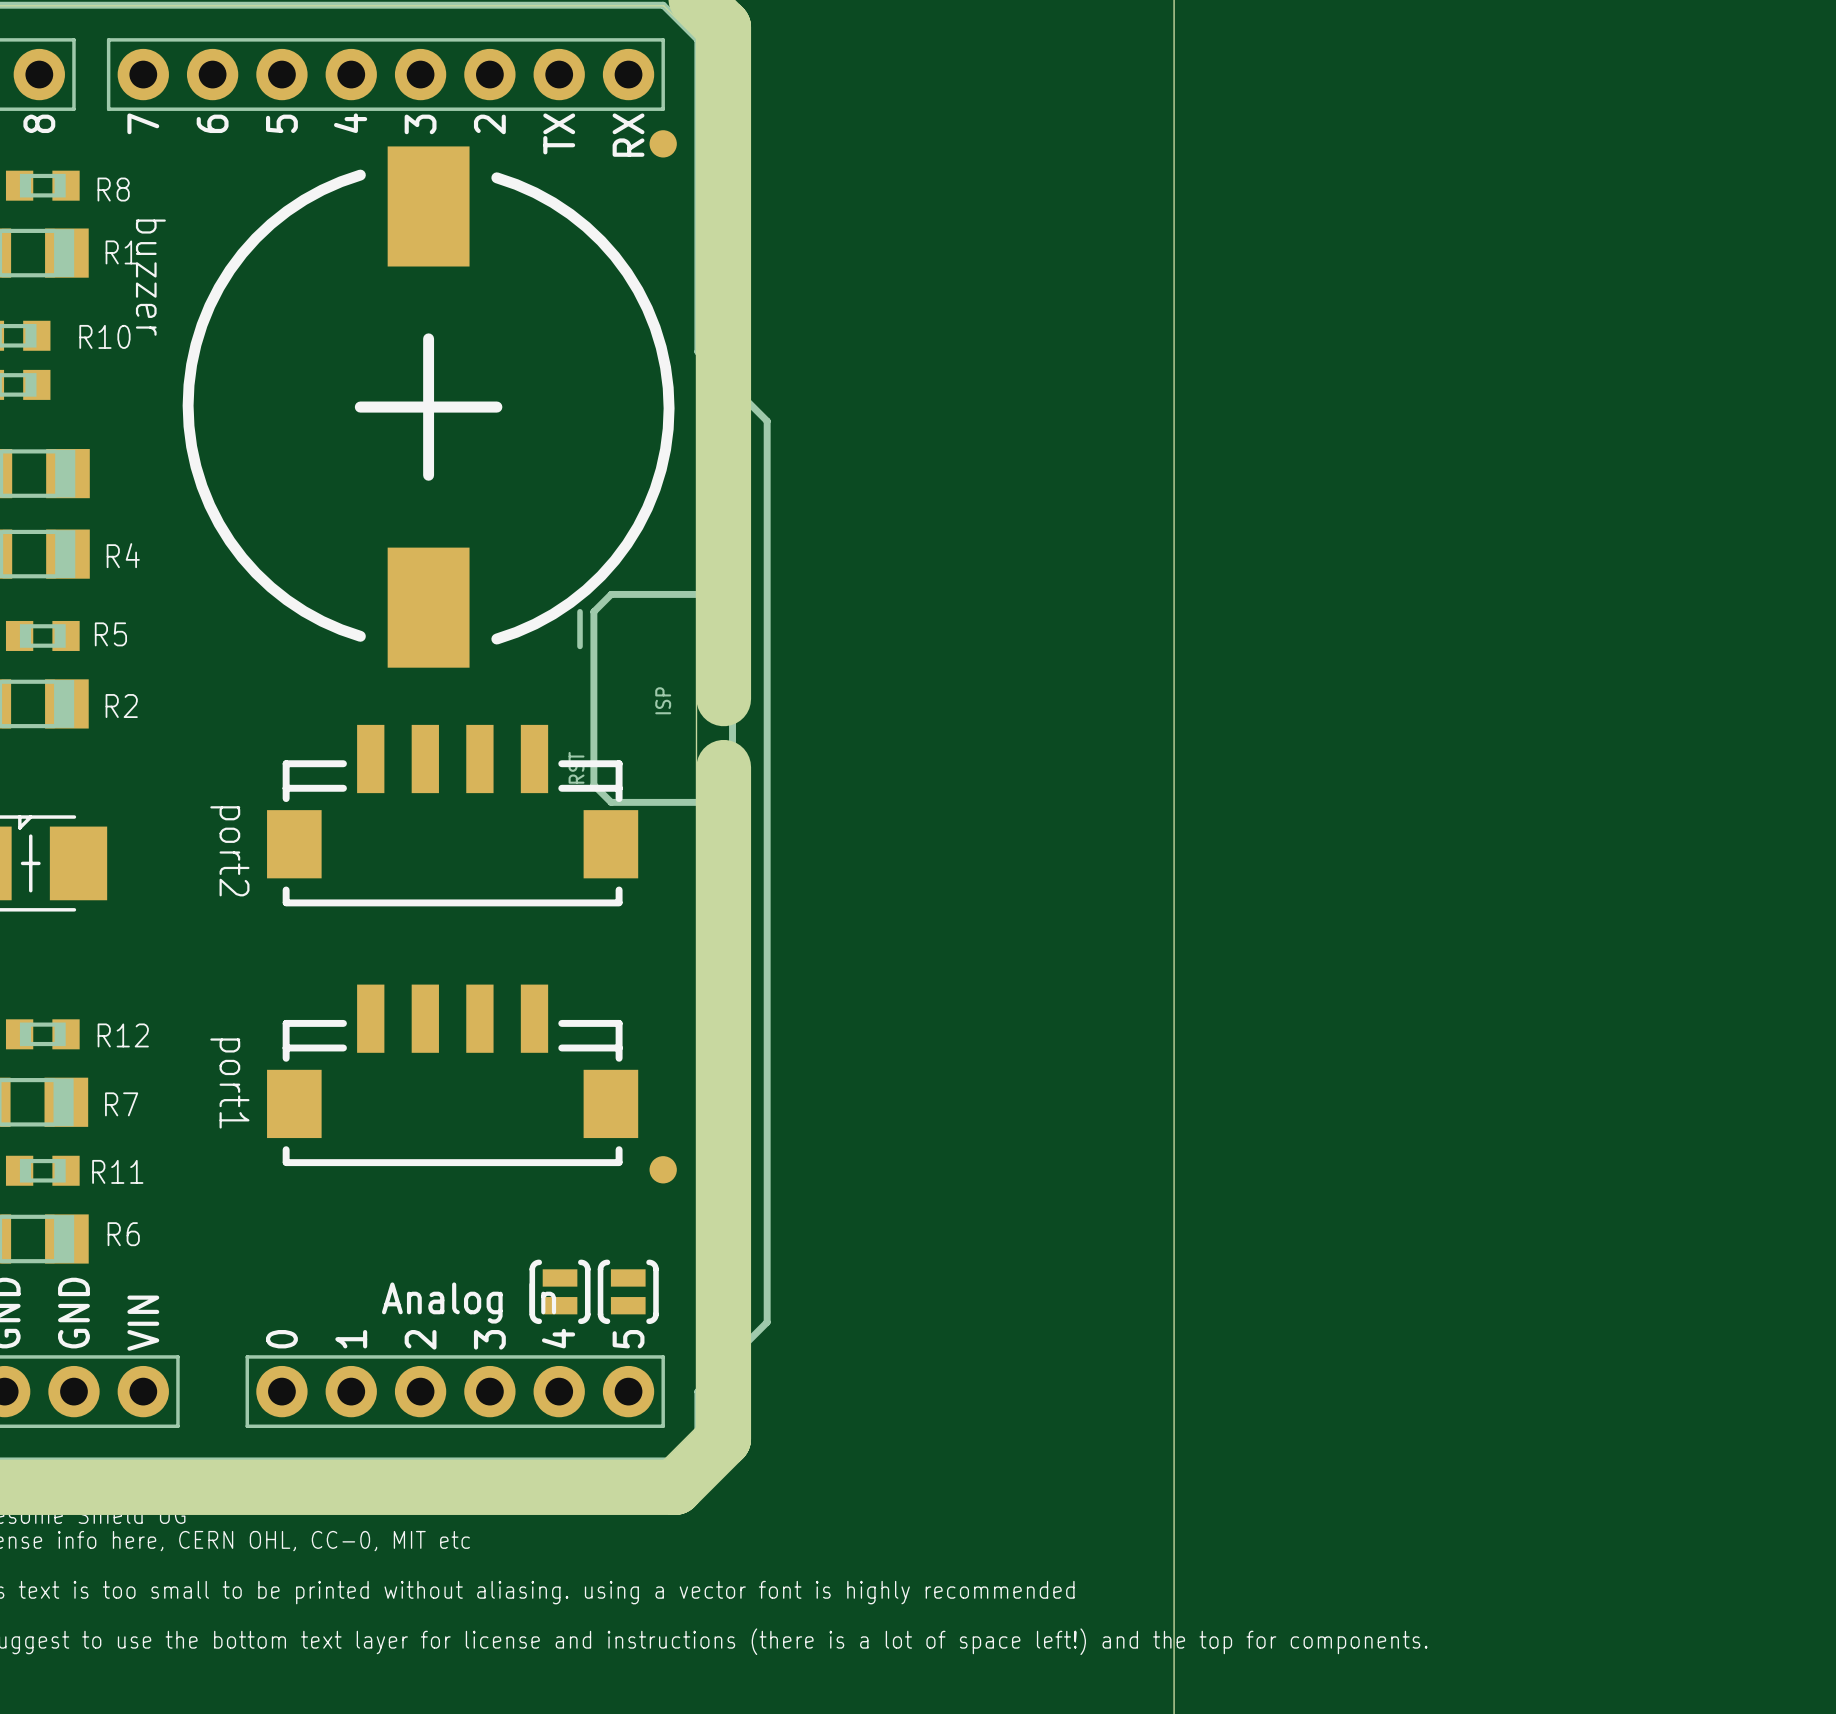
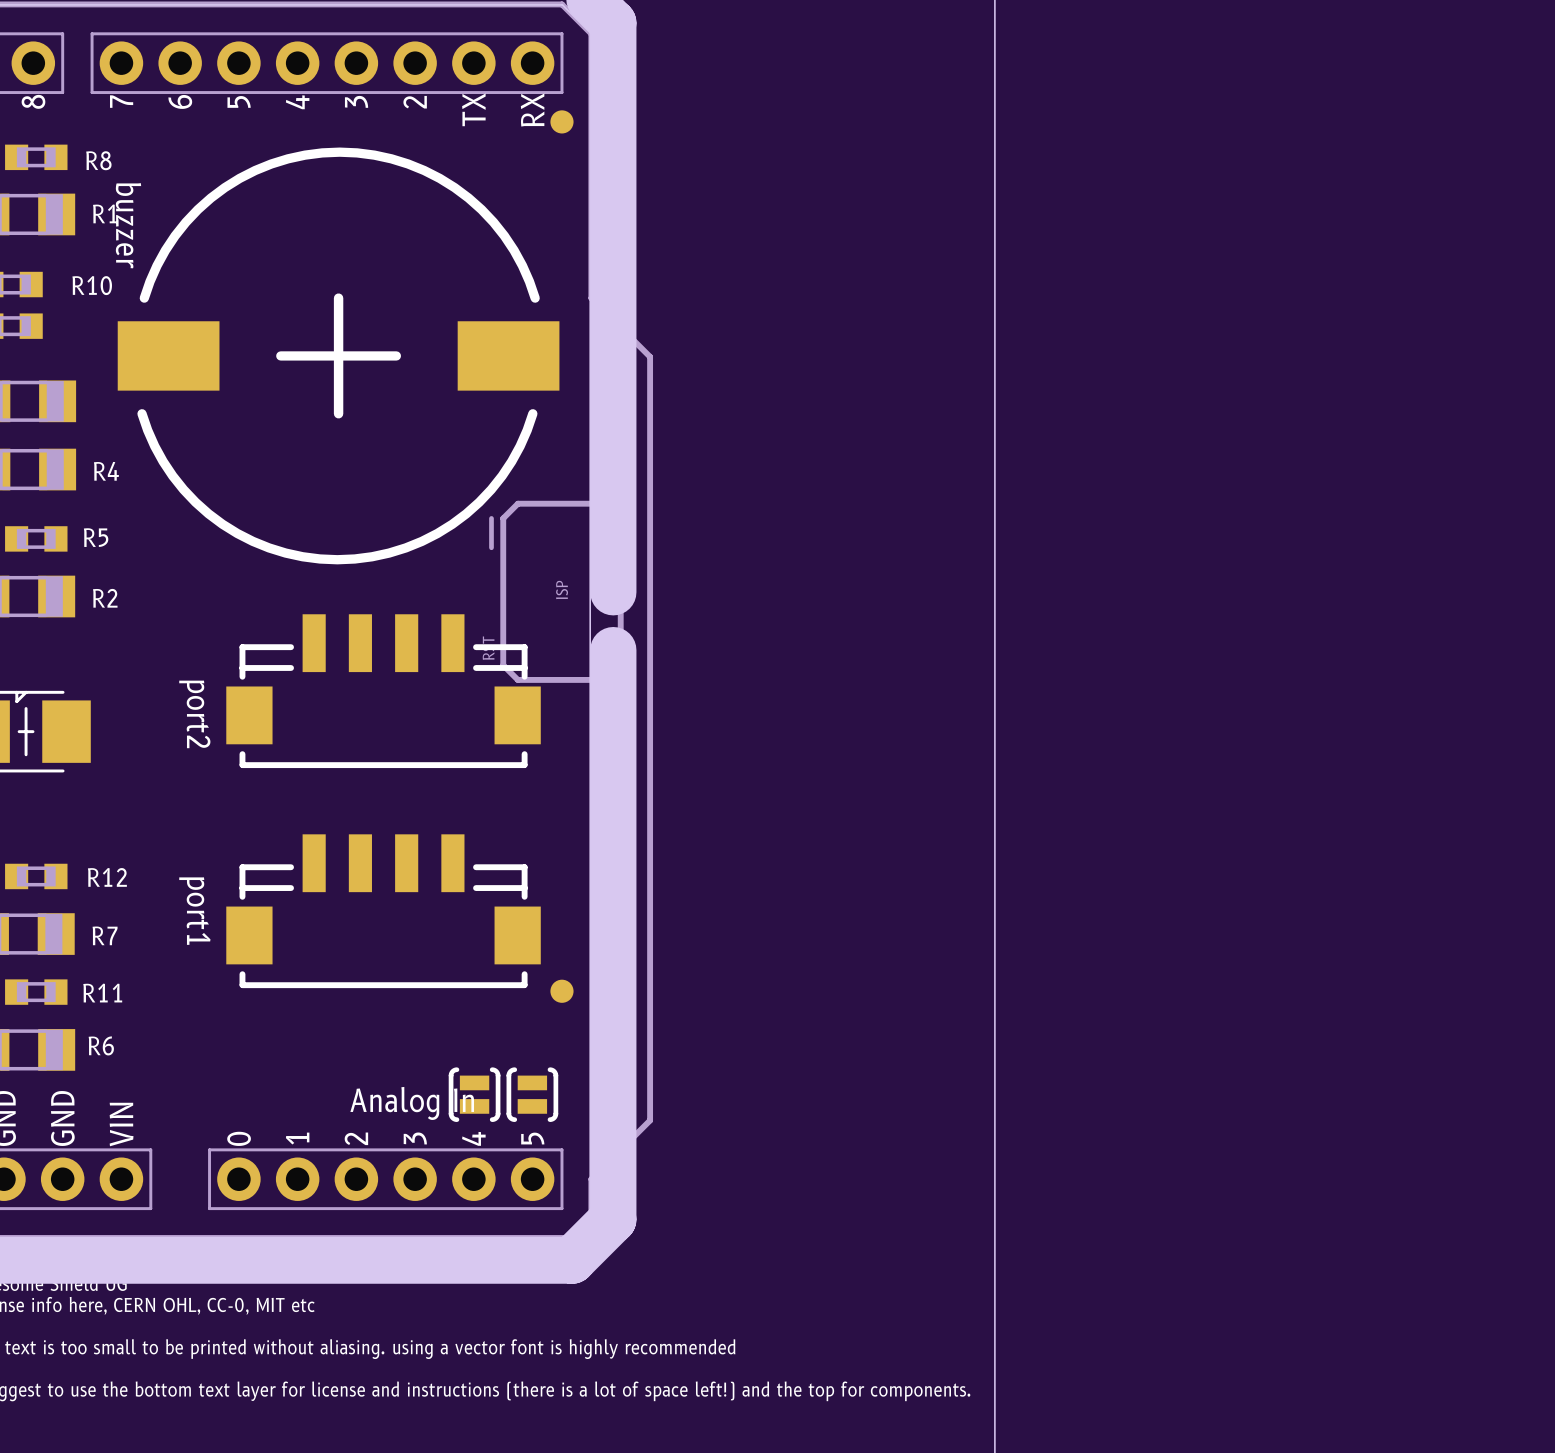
part rotation: 0° (428, 407) -> 90° clockwise (338, 355)

